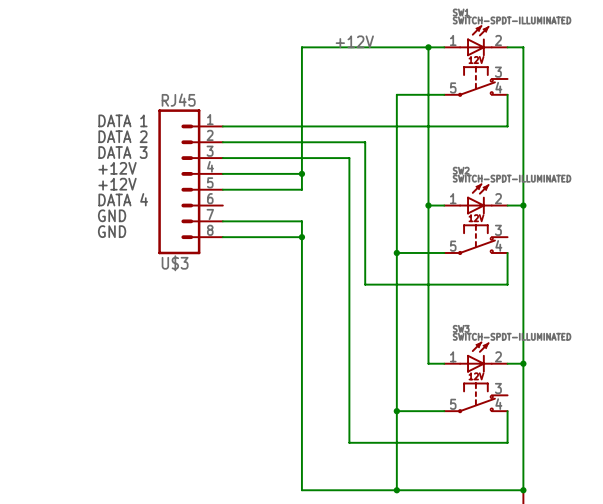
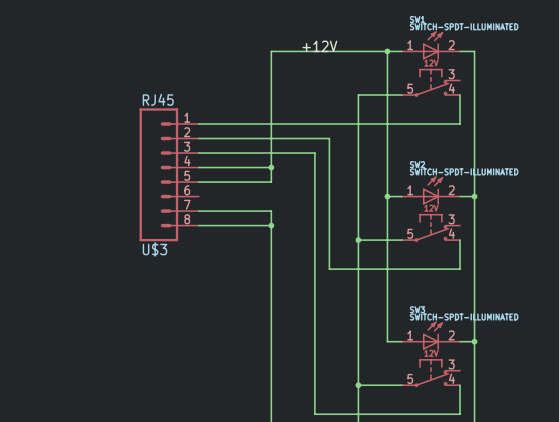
text: DATA 1 (122, 120) -> none
text: DATA 2 (122, 136) -> none
text: DATA 3 (122, 152) -> none
text: +12V (117, 168) -> none
text: +12V (117, 184) -> none
text: DATA 4 (123, 199) -> none
text: GND (112, 215) -> none
text: GND (112, 231) -> none

